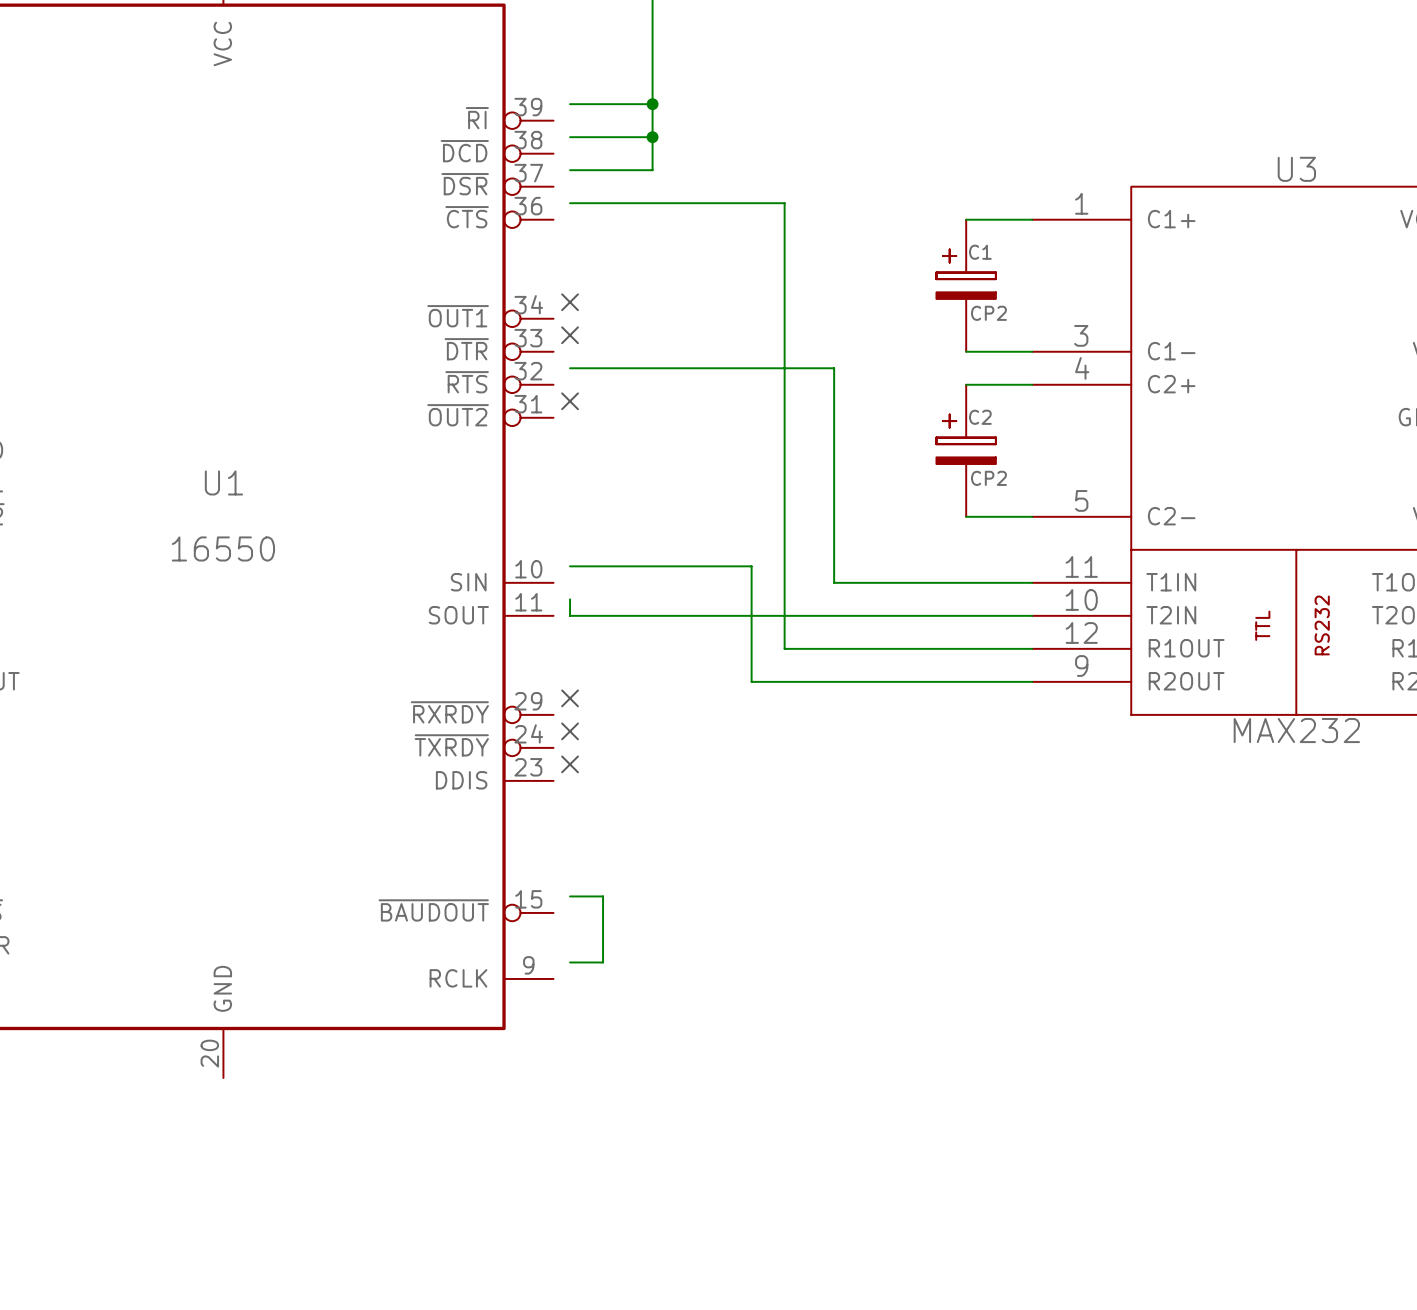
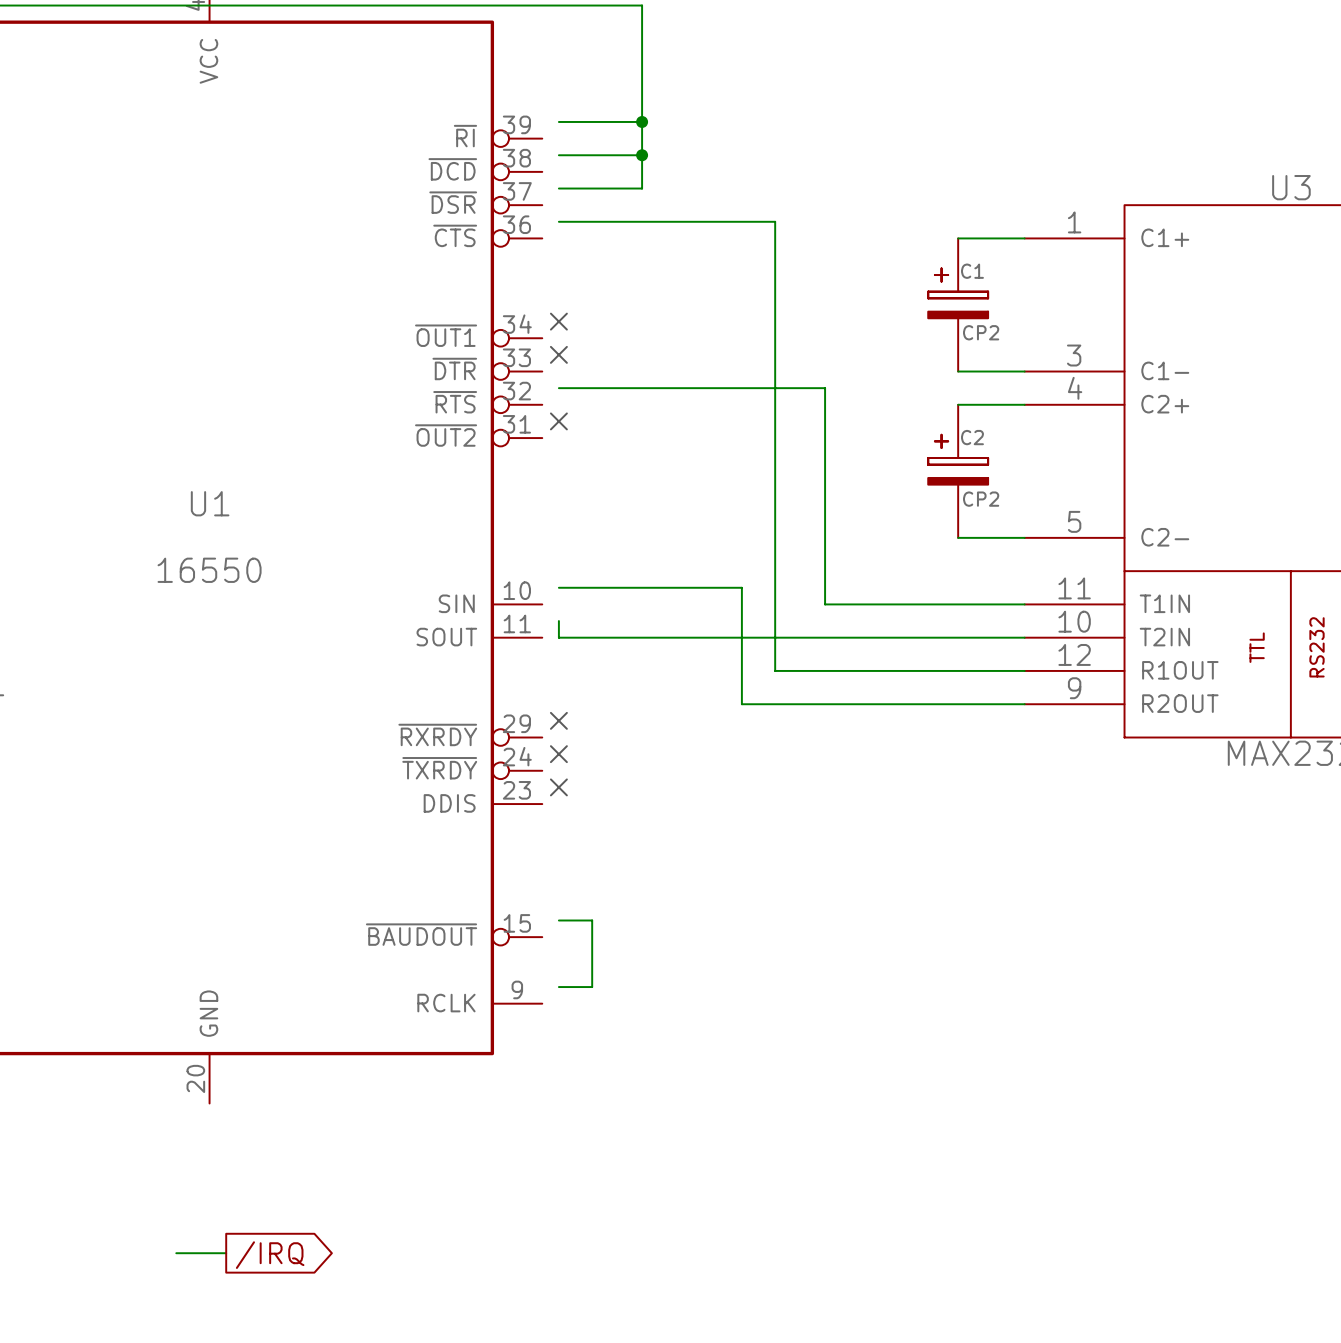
wire: none -> (176, 1253) (226, 1253)
global label: none -> /IRQ (270, 1255)

